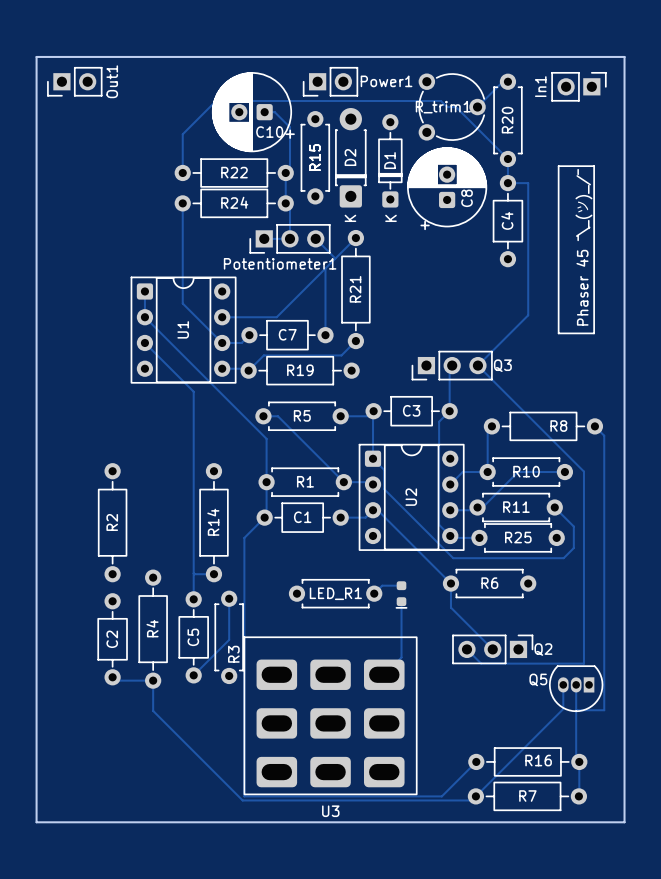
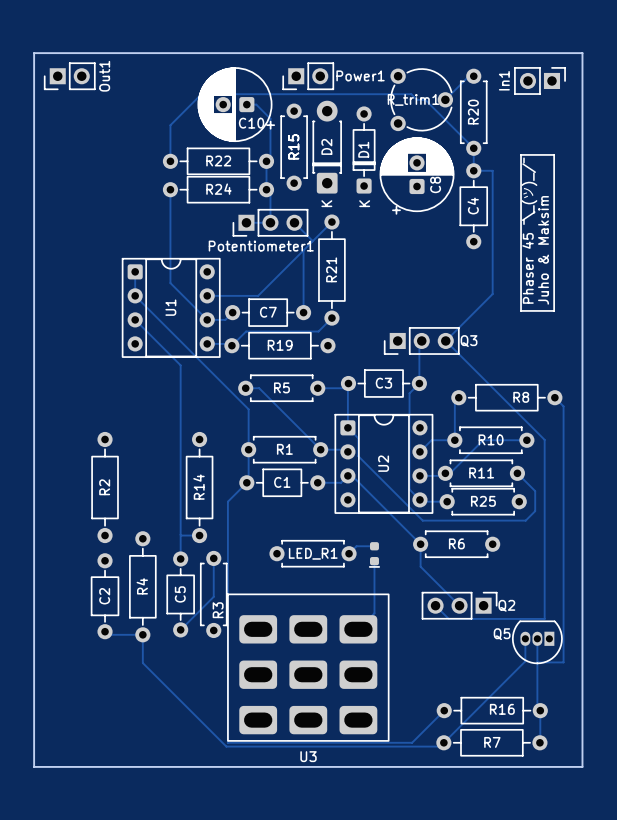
text: none -> Phaser 45 ¯\_(ツ)_/¯ (529, 230)
text: Phaser 45 ¯\_(ツ)_/¯ (583, 247) -> Juho & Maksim (543, 250)

